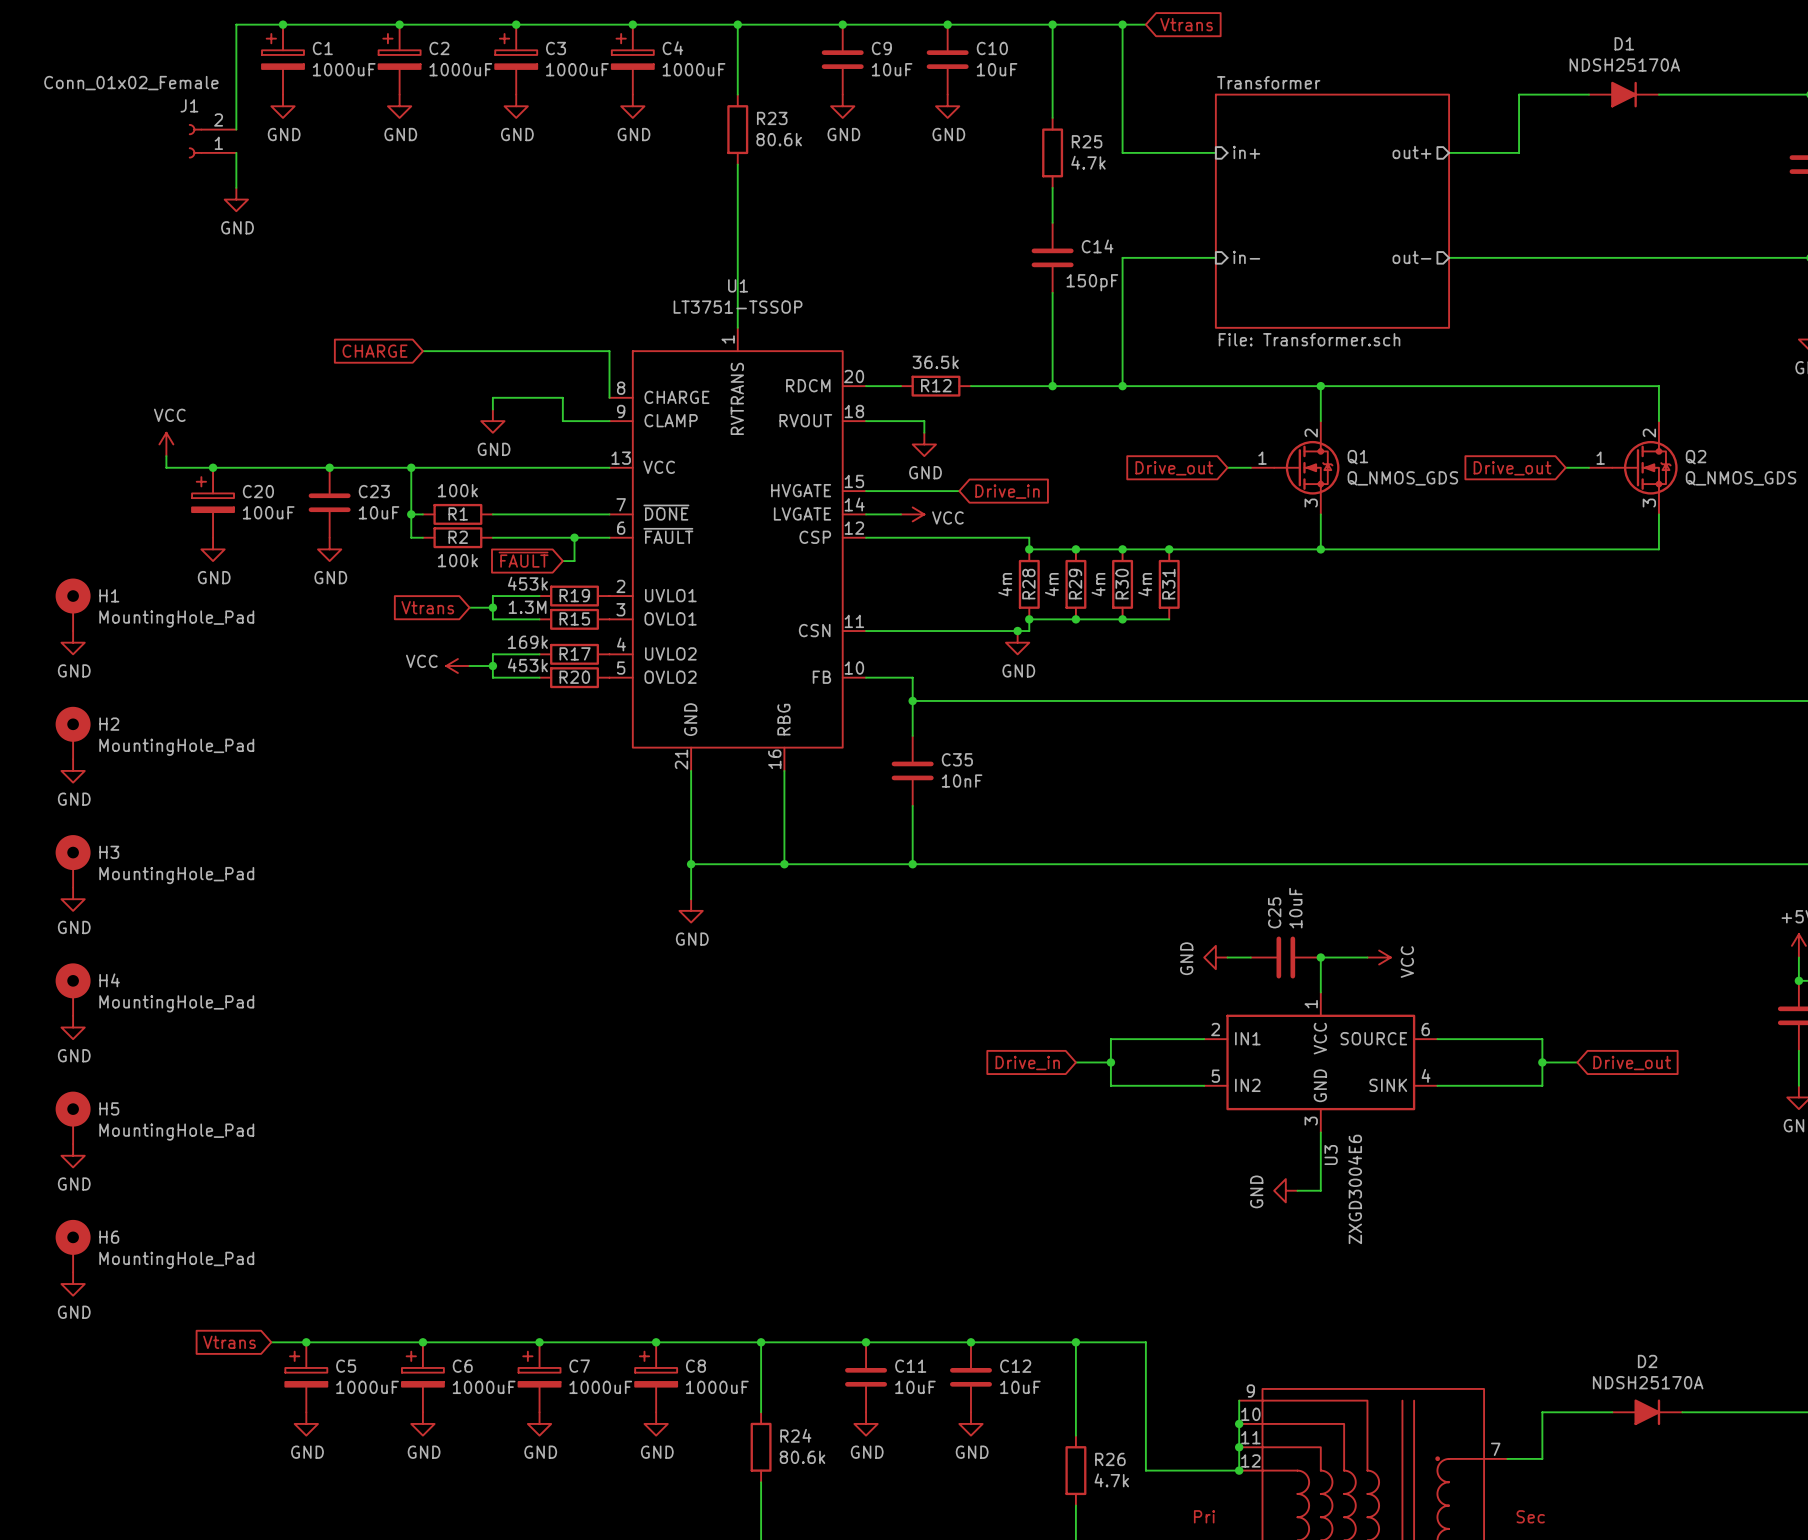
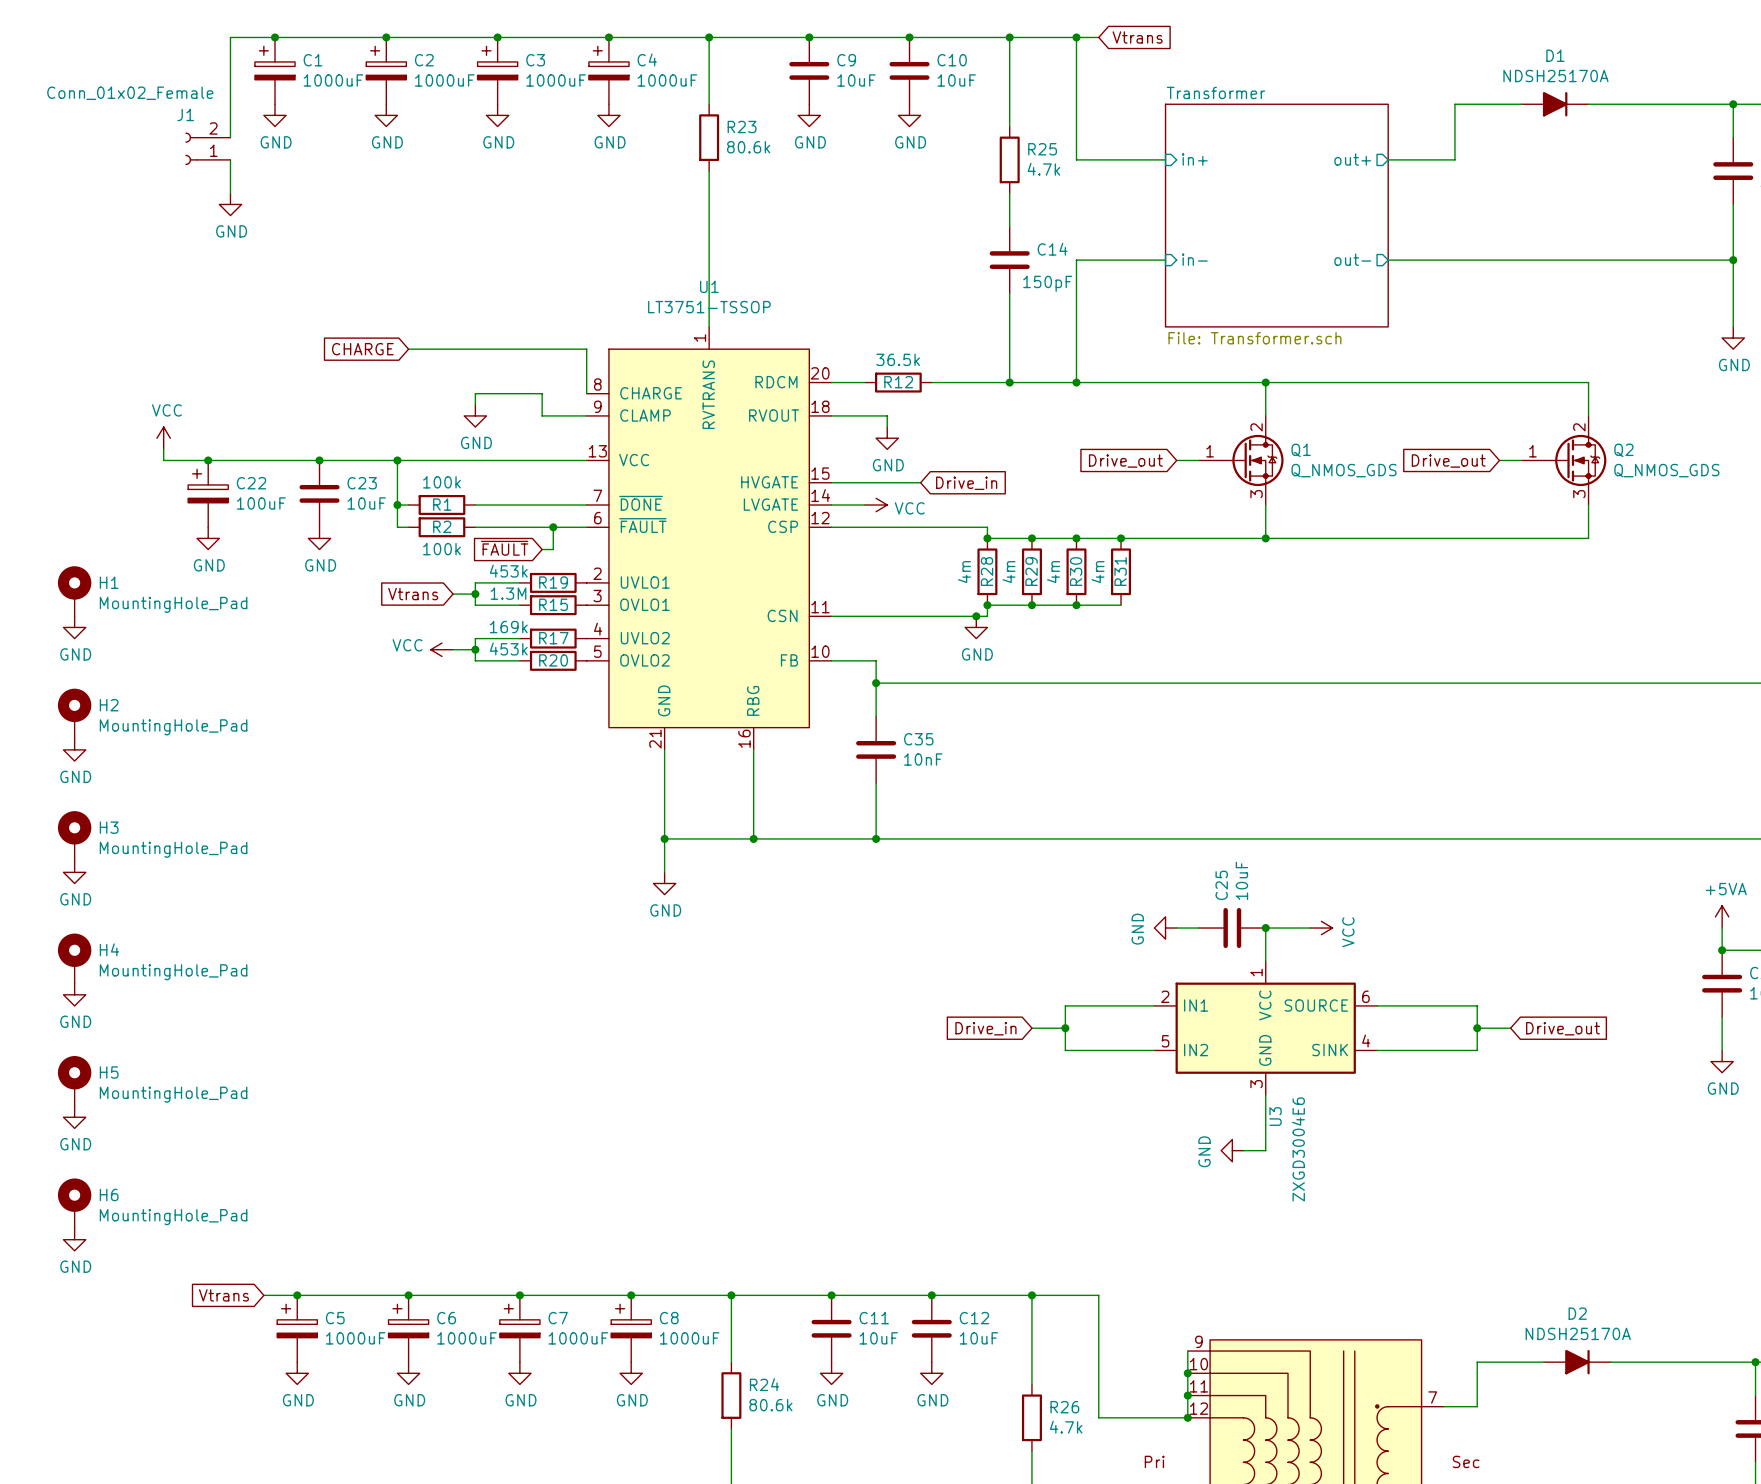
C20 name: C20 (258, 491) -> C22 (251, 483)

